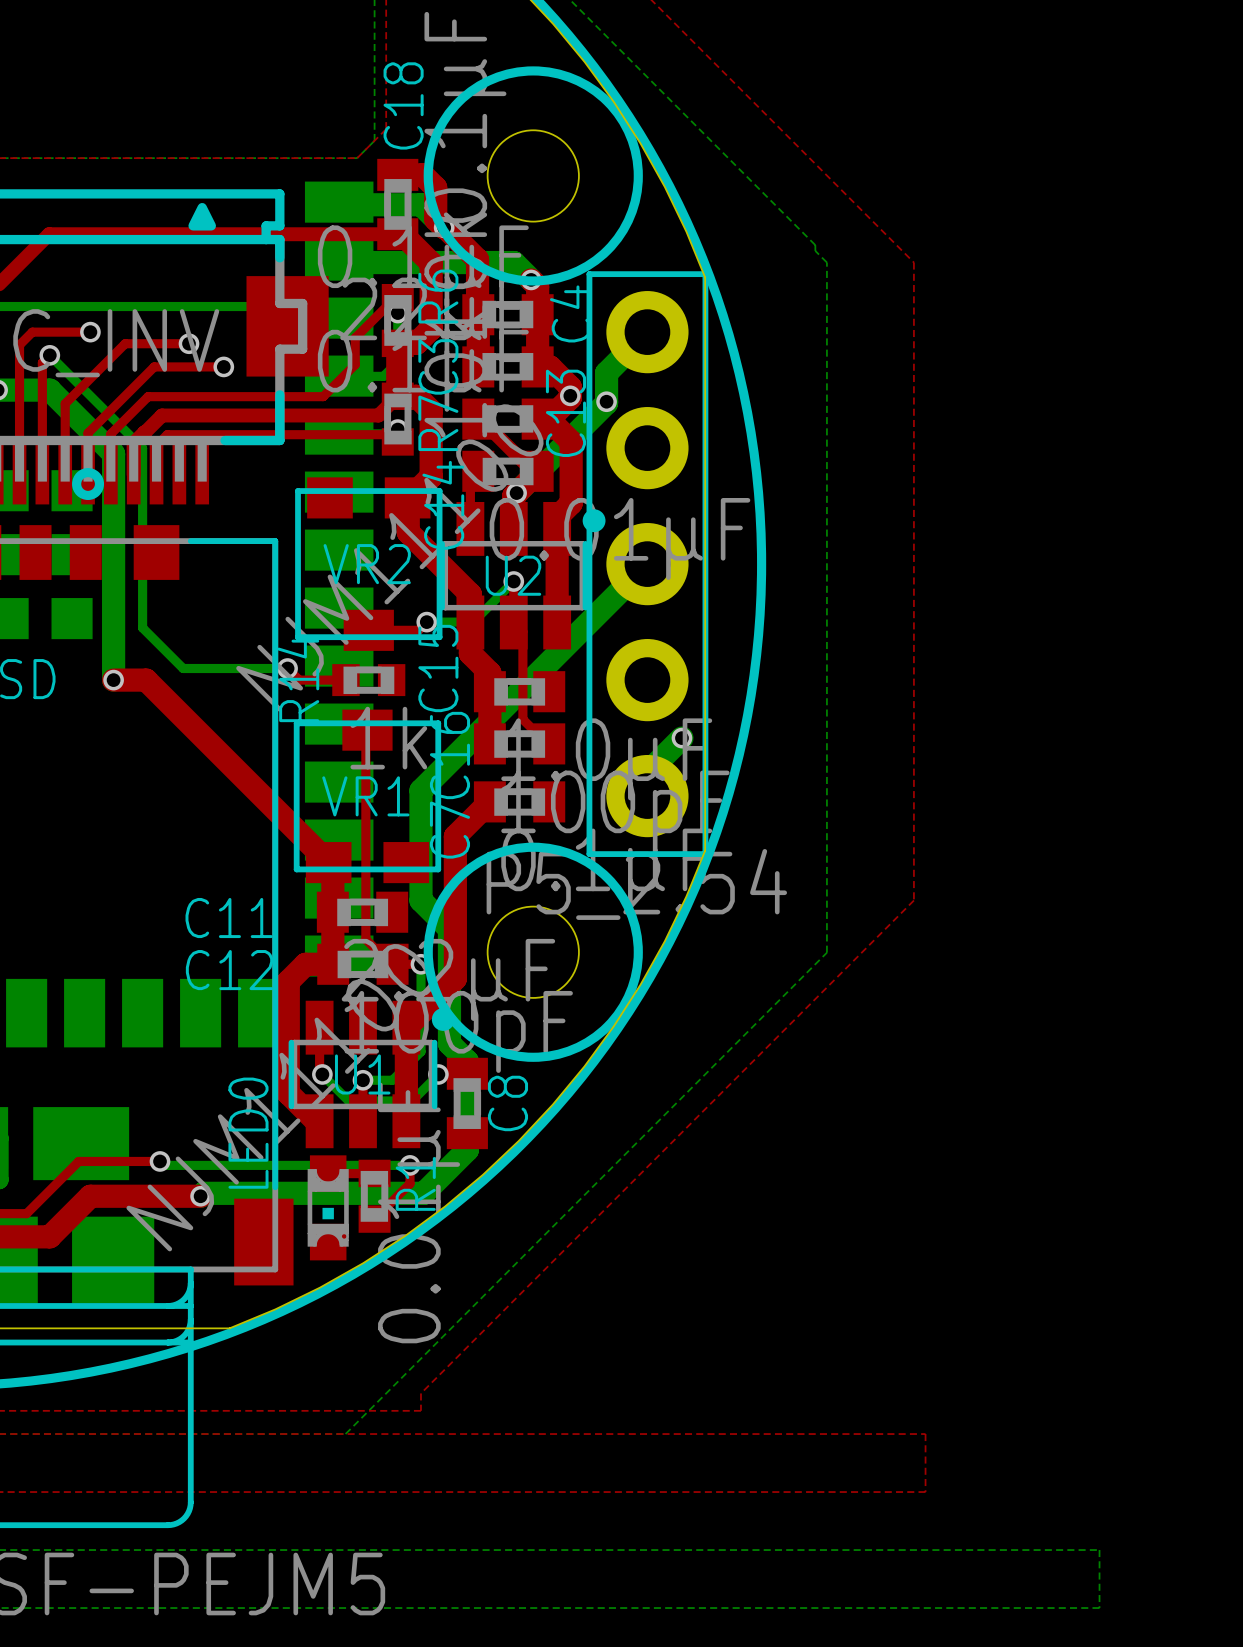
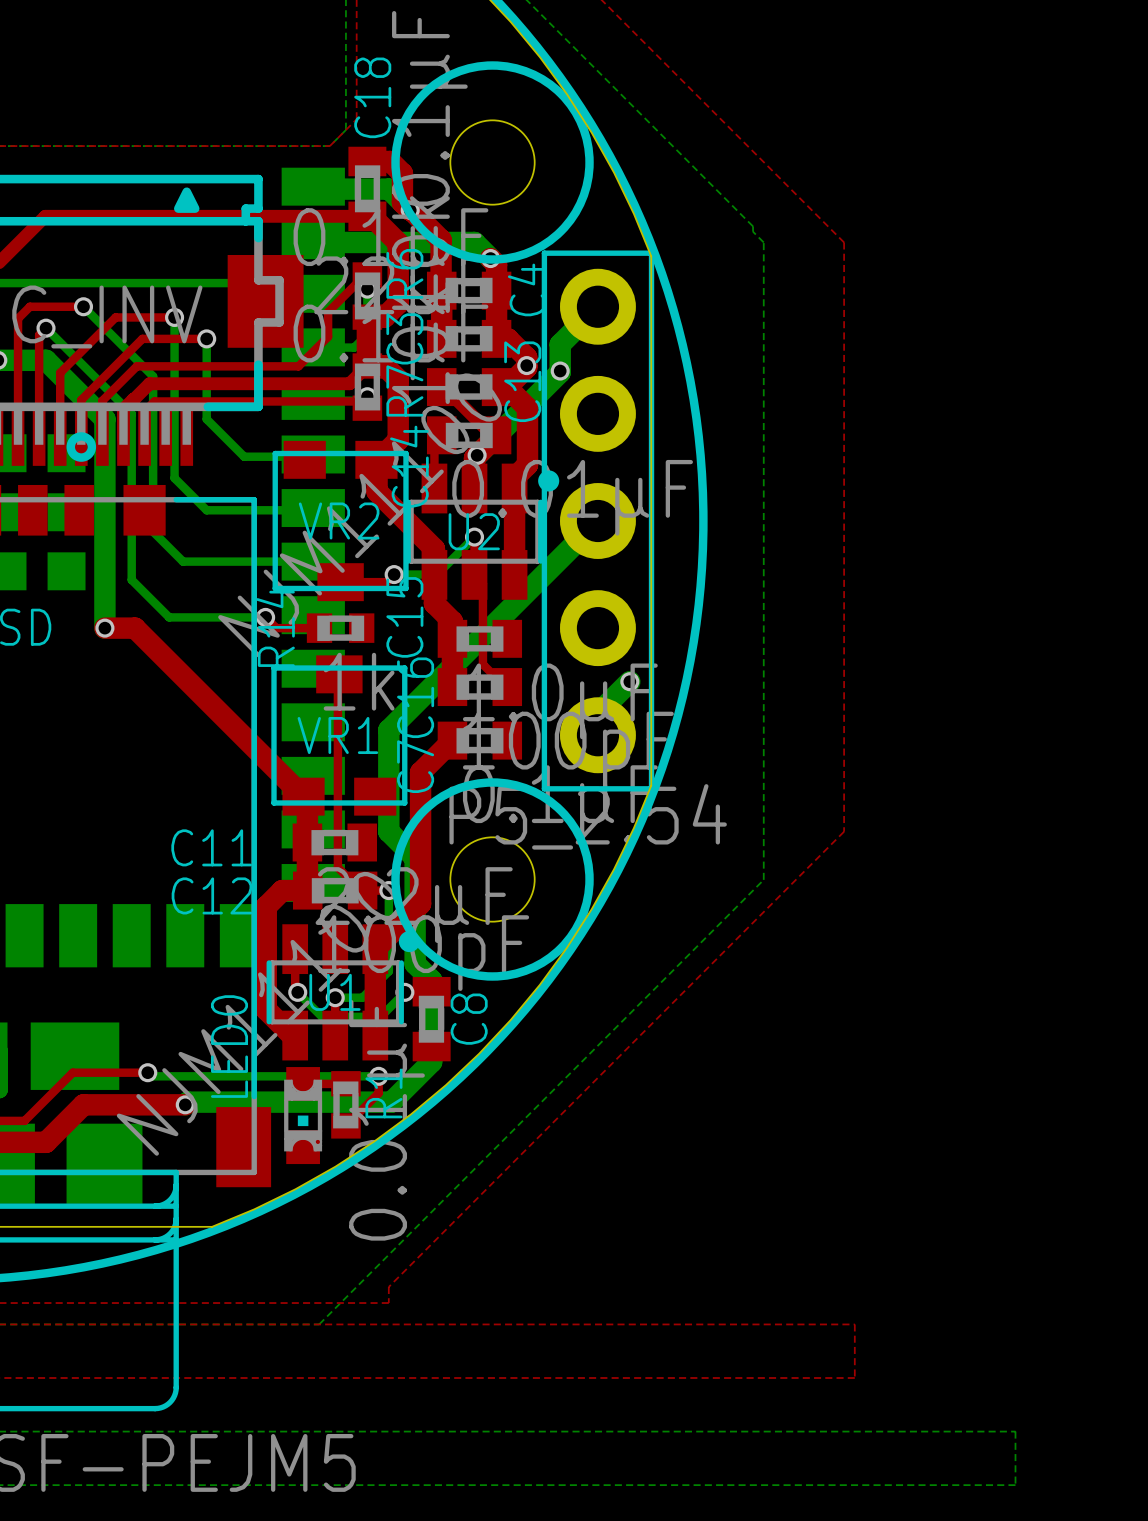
bottom track: none -> (83, 306) (153, 376) (153, 531) (183, 561) (313, 561)
bottom track: none -> (174, 317) (174, 478) (206, 510) (311, 510) (313, 508)
bottom track: none -> (206, 338) (206, 419) (244, 456) (311, 456) (313, 454)

